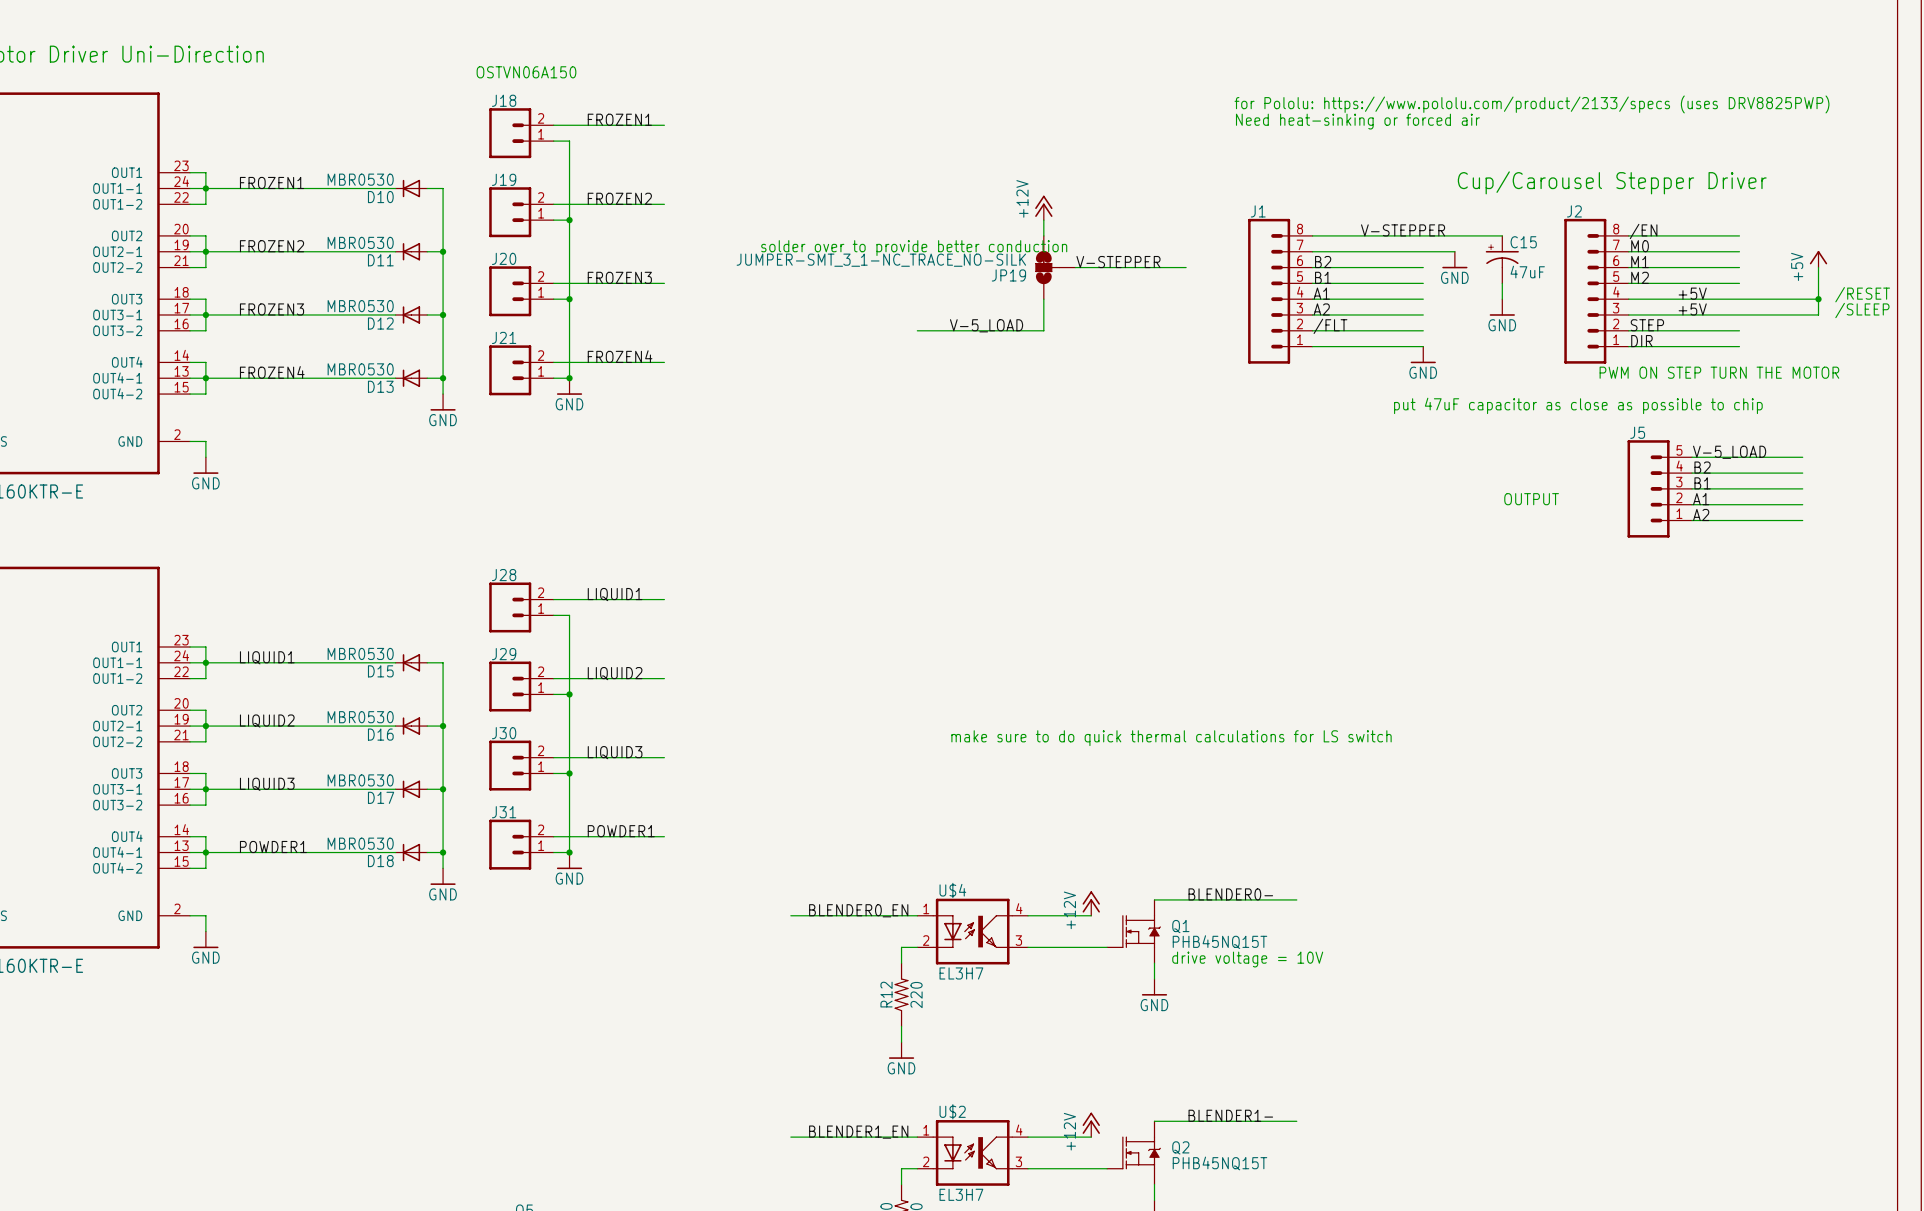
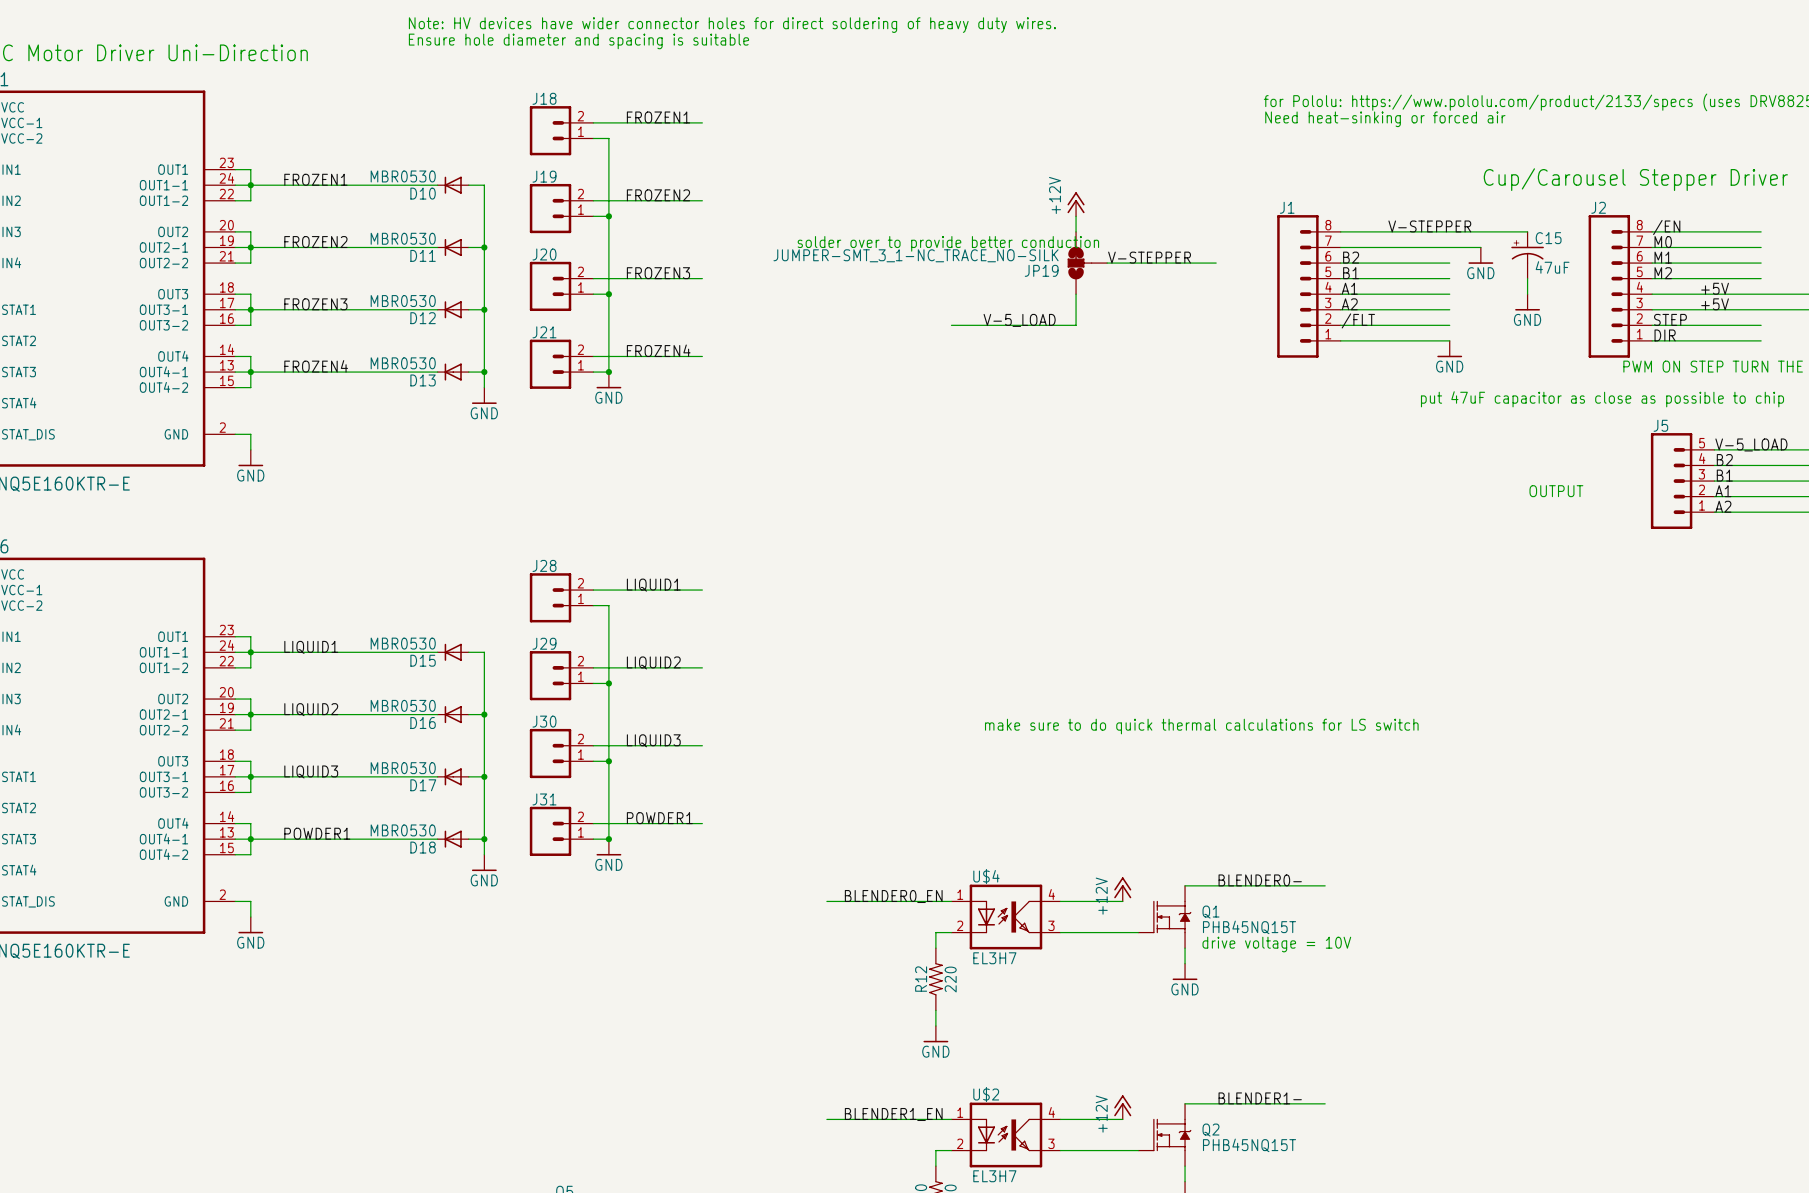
text: none -> Note: HV devices have wider connector holes for direct soldering of heavy duty wires. (732, 25)
text: none -> Ensure hole diameter and spacing is suitable (578, 41)
text: OSTVN06A150 (526, 72) -> none

